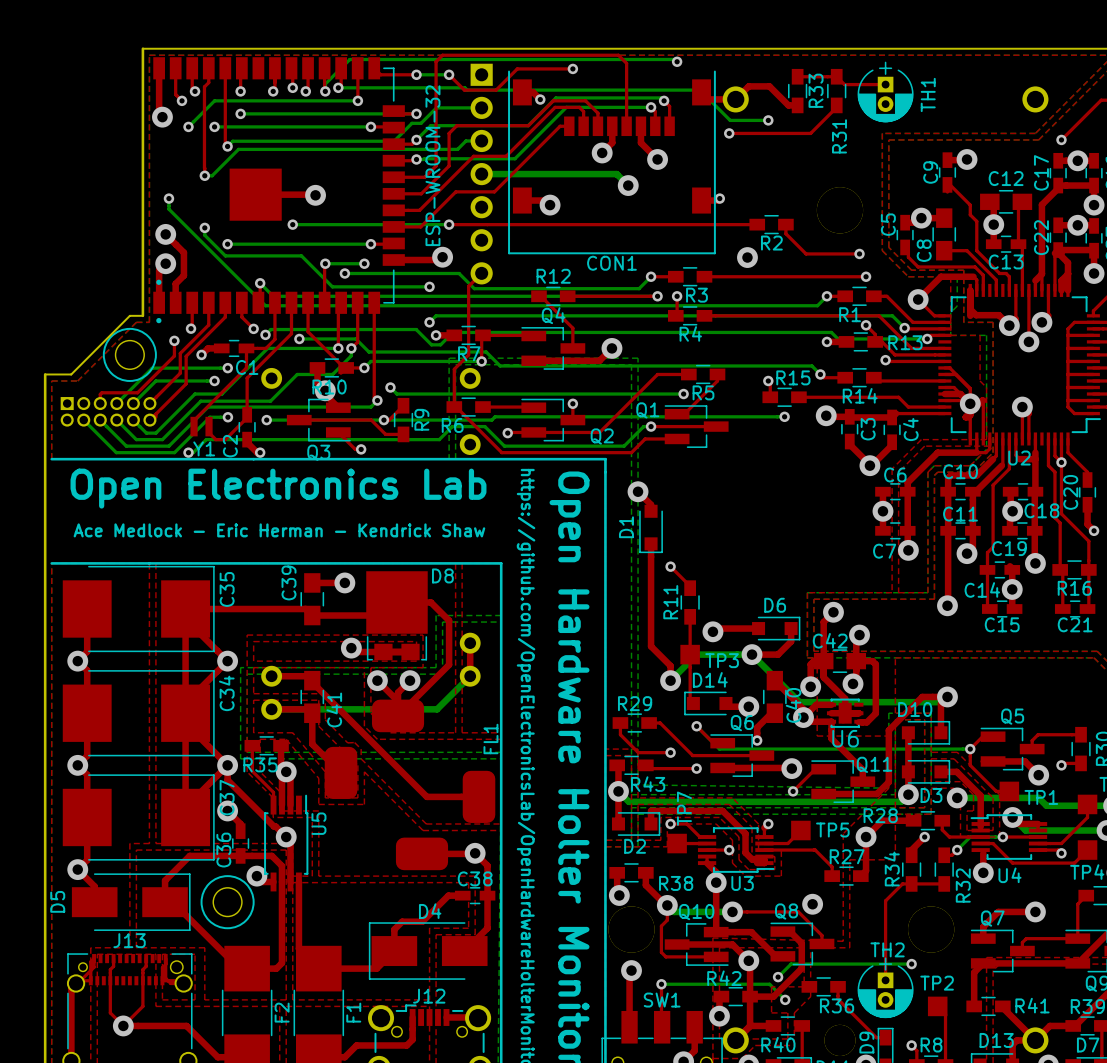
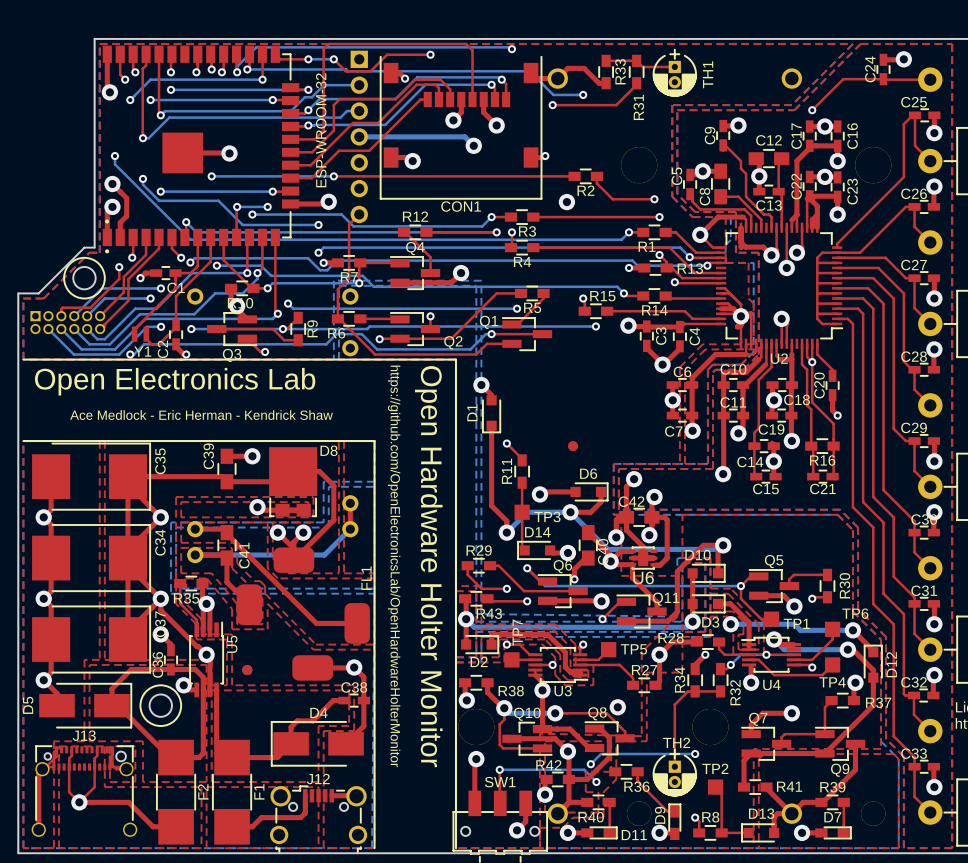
part: none -> (573, 446)
part: none -> (247, 670)

